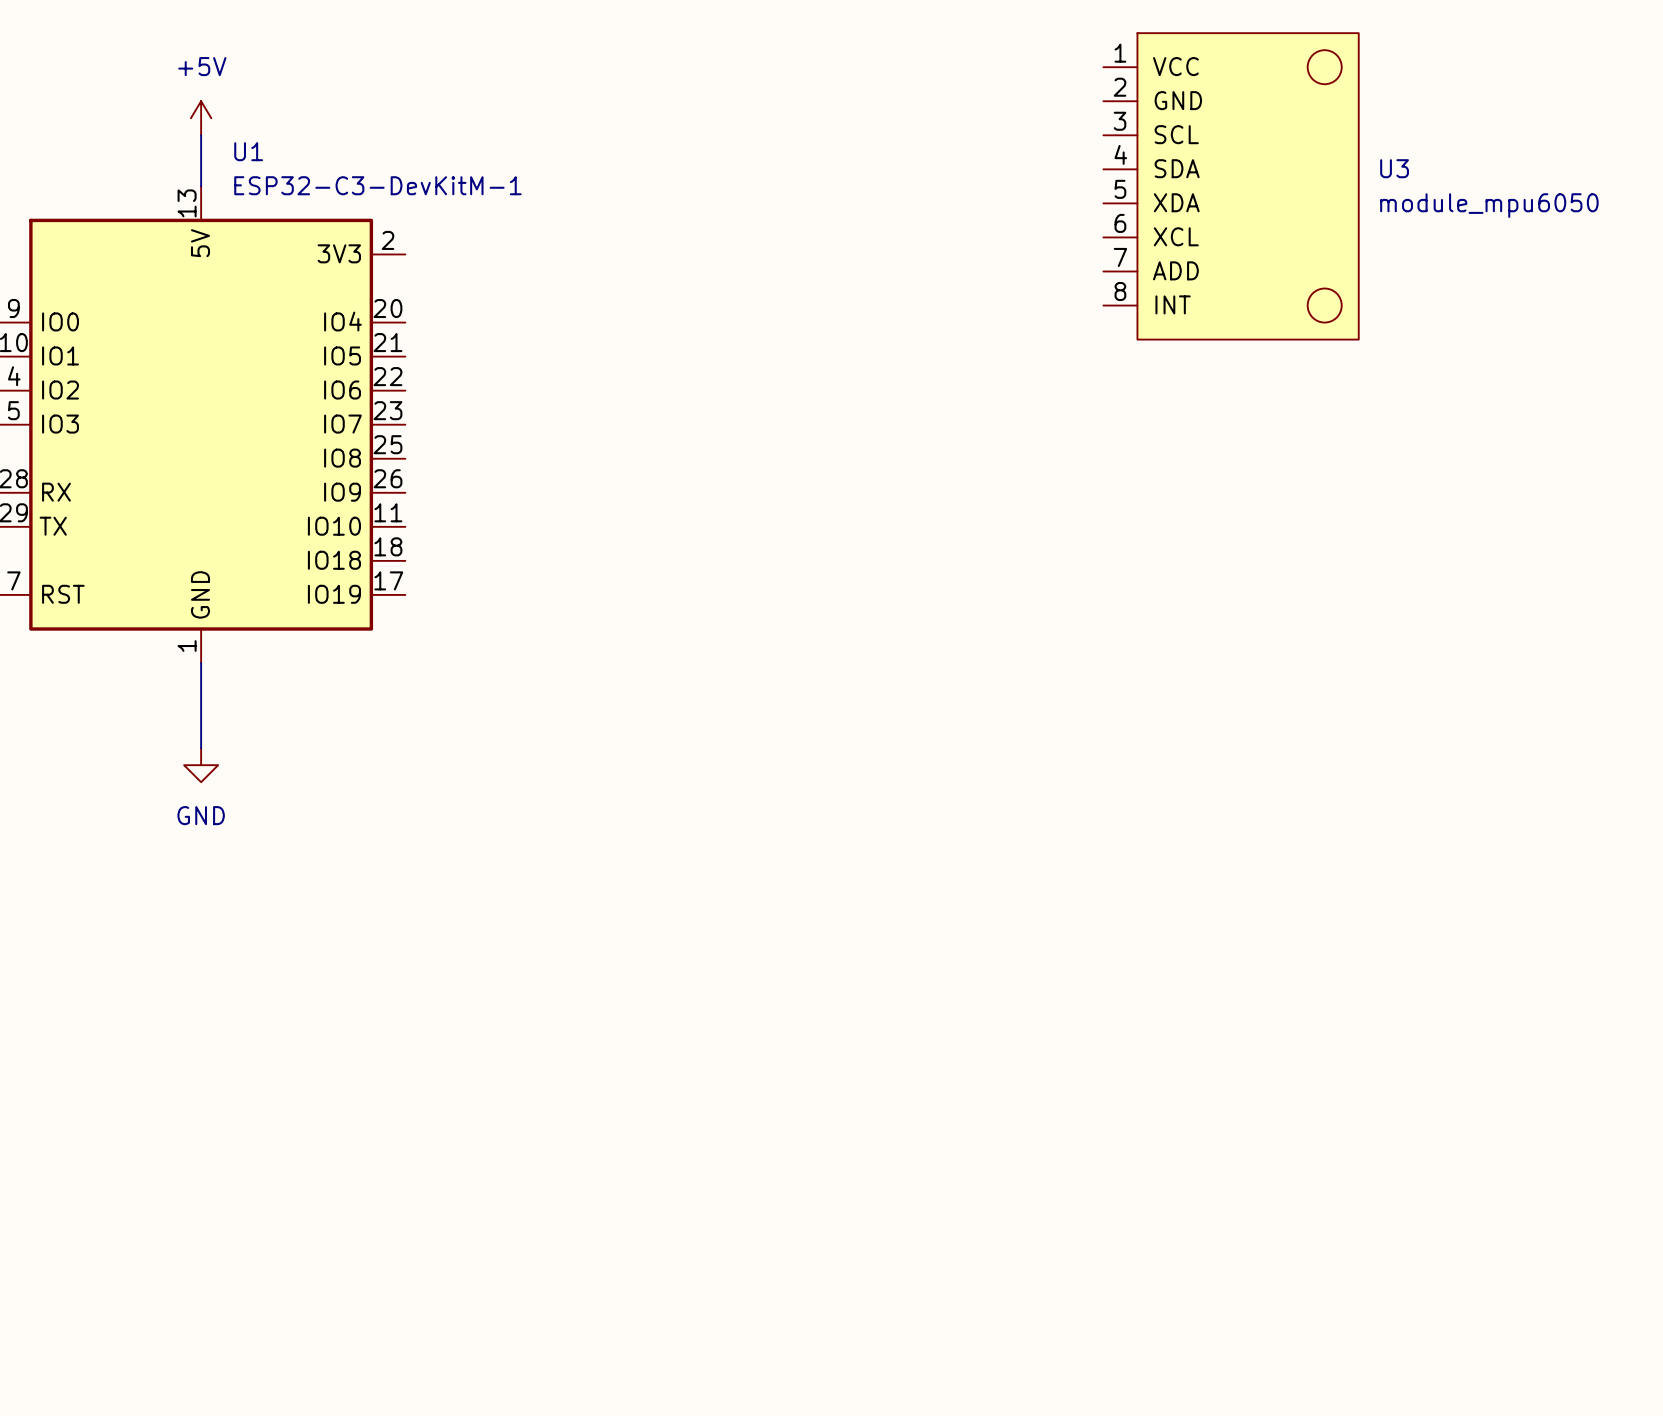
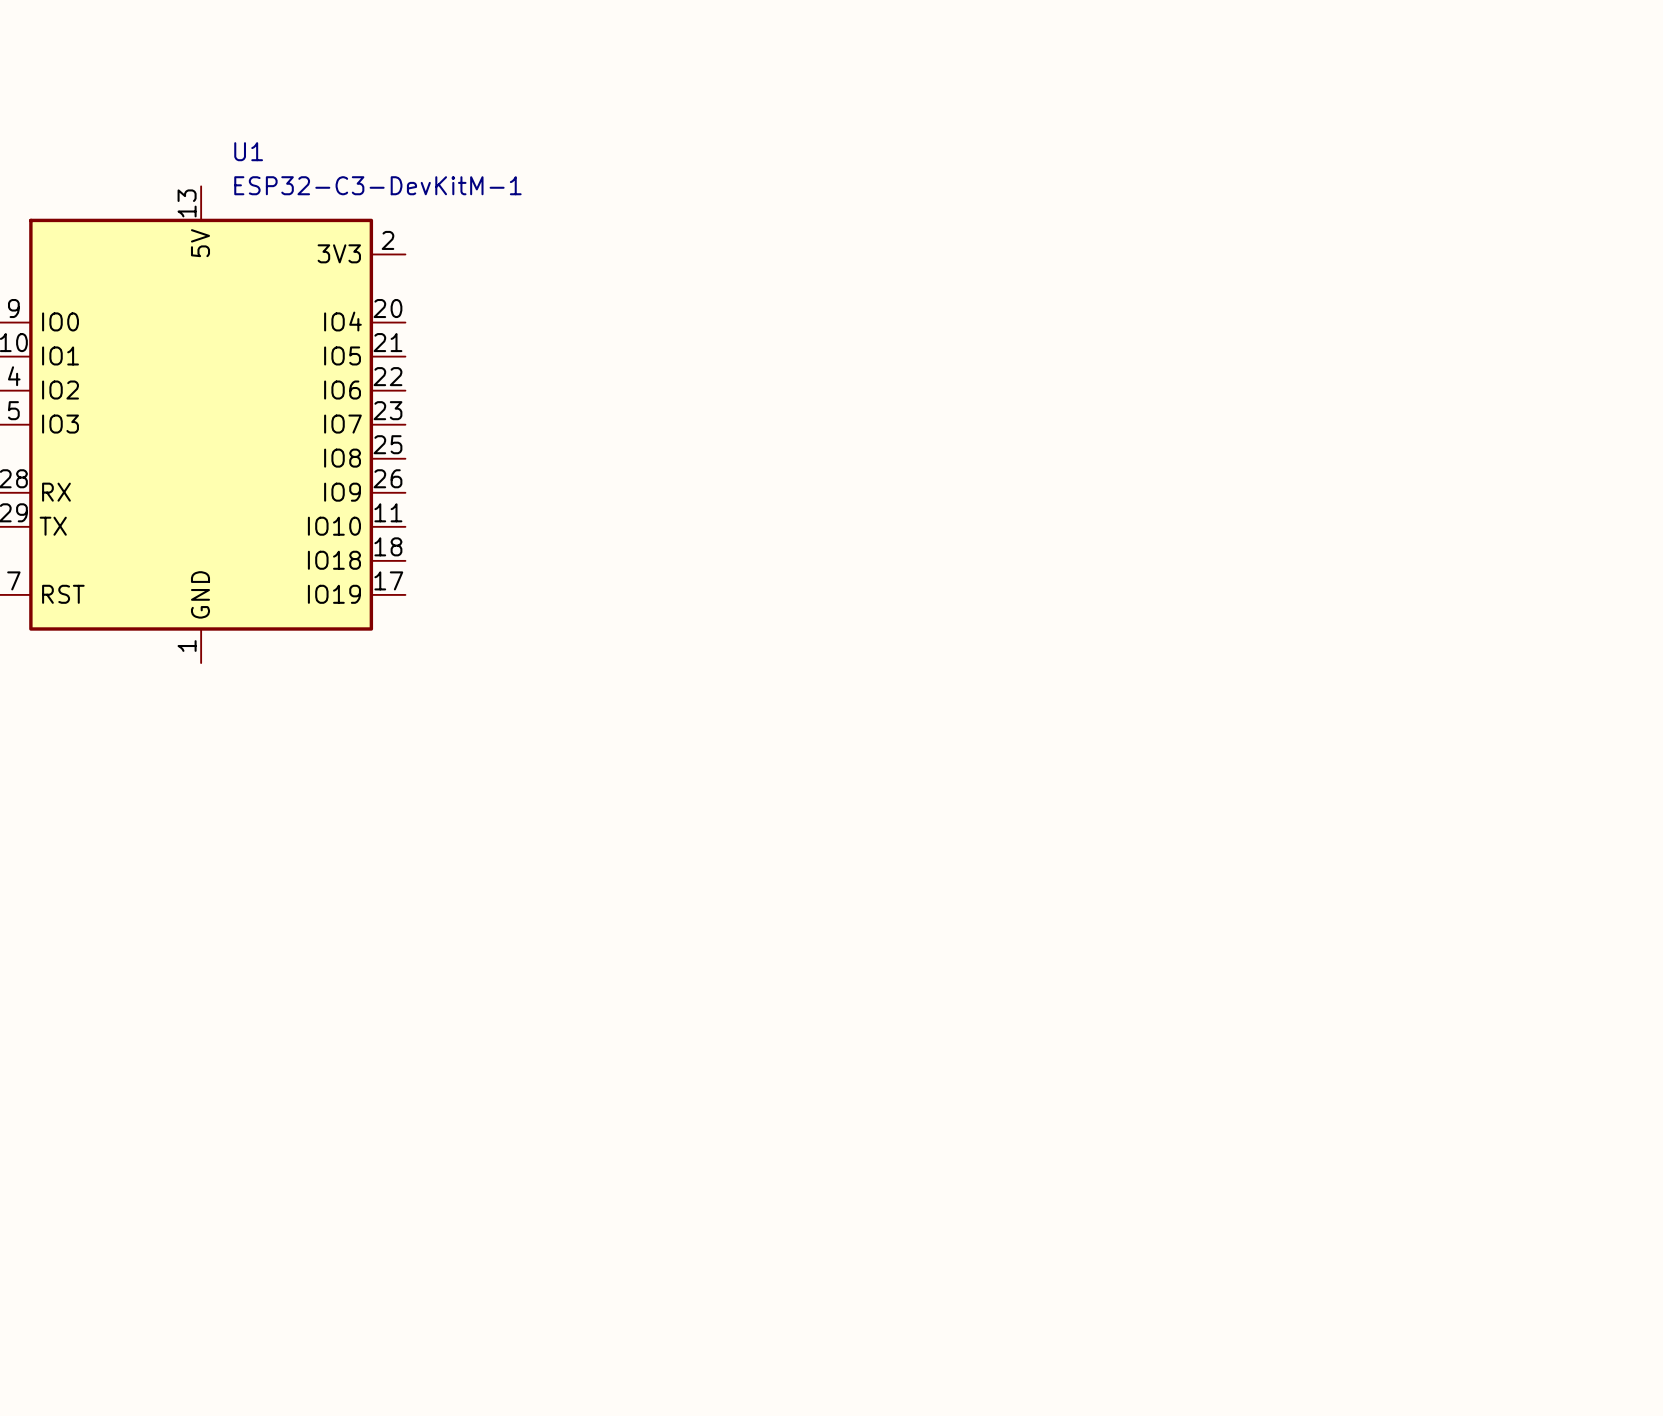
power symbol: +5V (201, 118) -> none
wire: (201, 135) (201, 186) -> none
U3: module_mpu6050 (1231, 186) -> none
wire: (201, 663) (201, 748) -> none
power symbol: GND (201, 765) -> none

